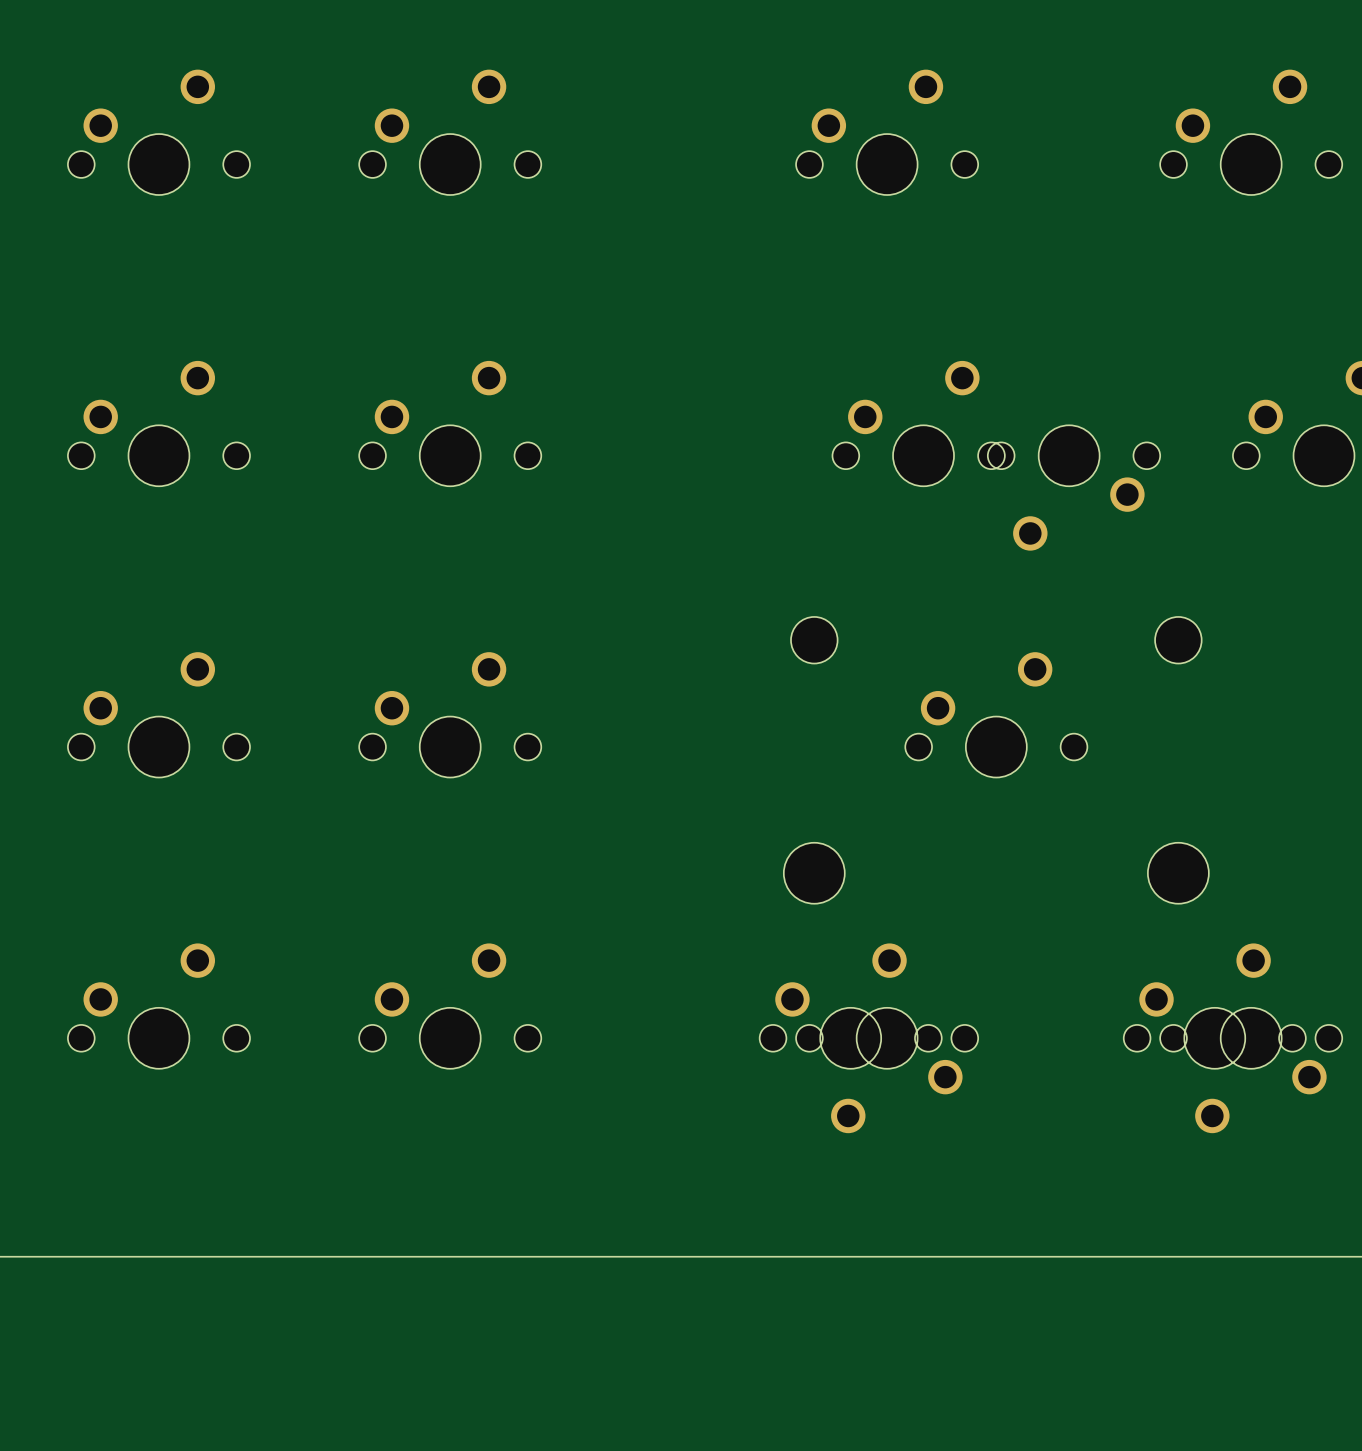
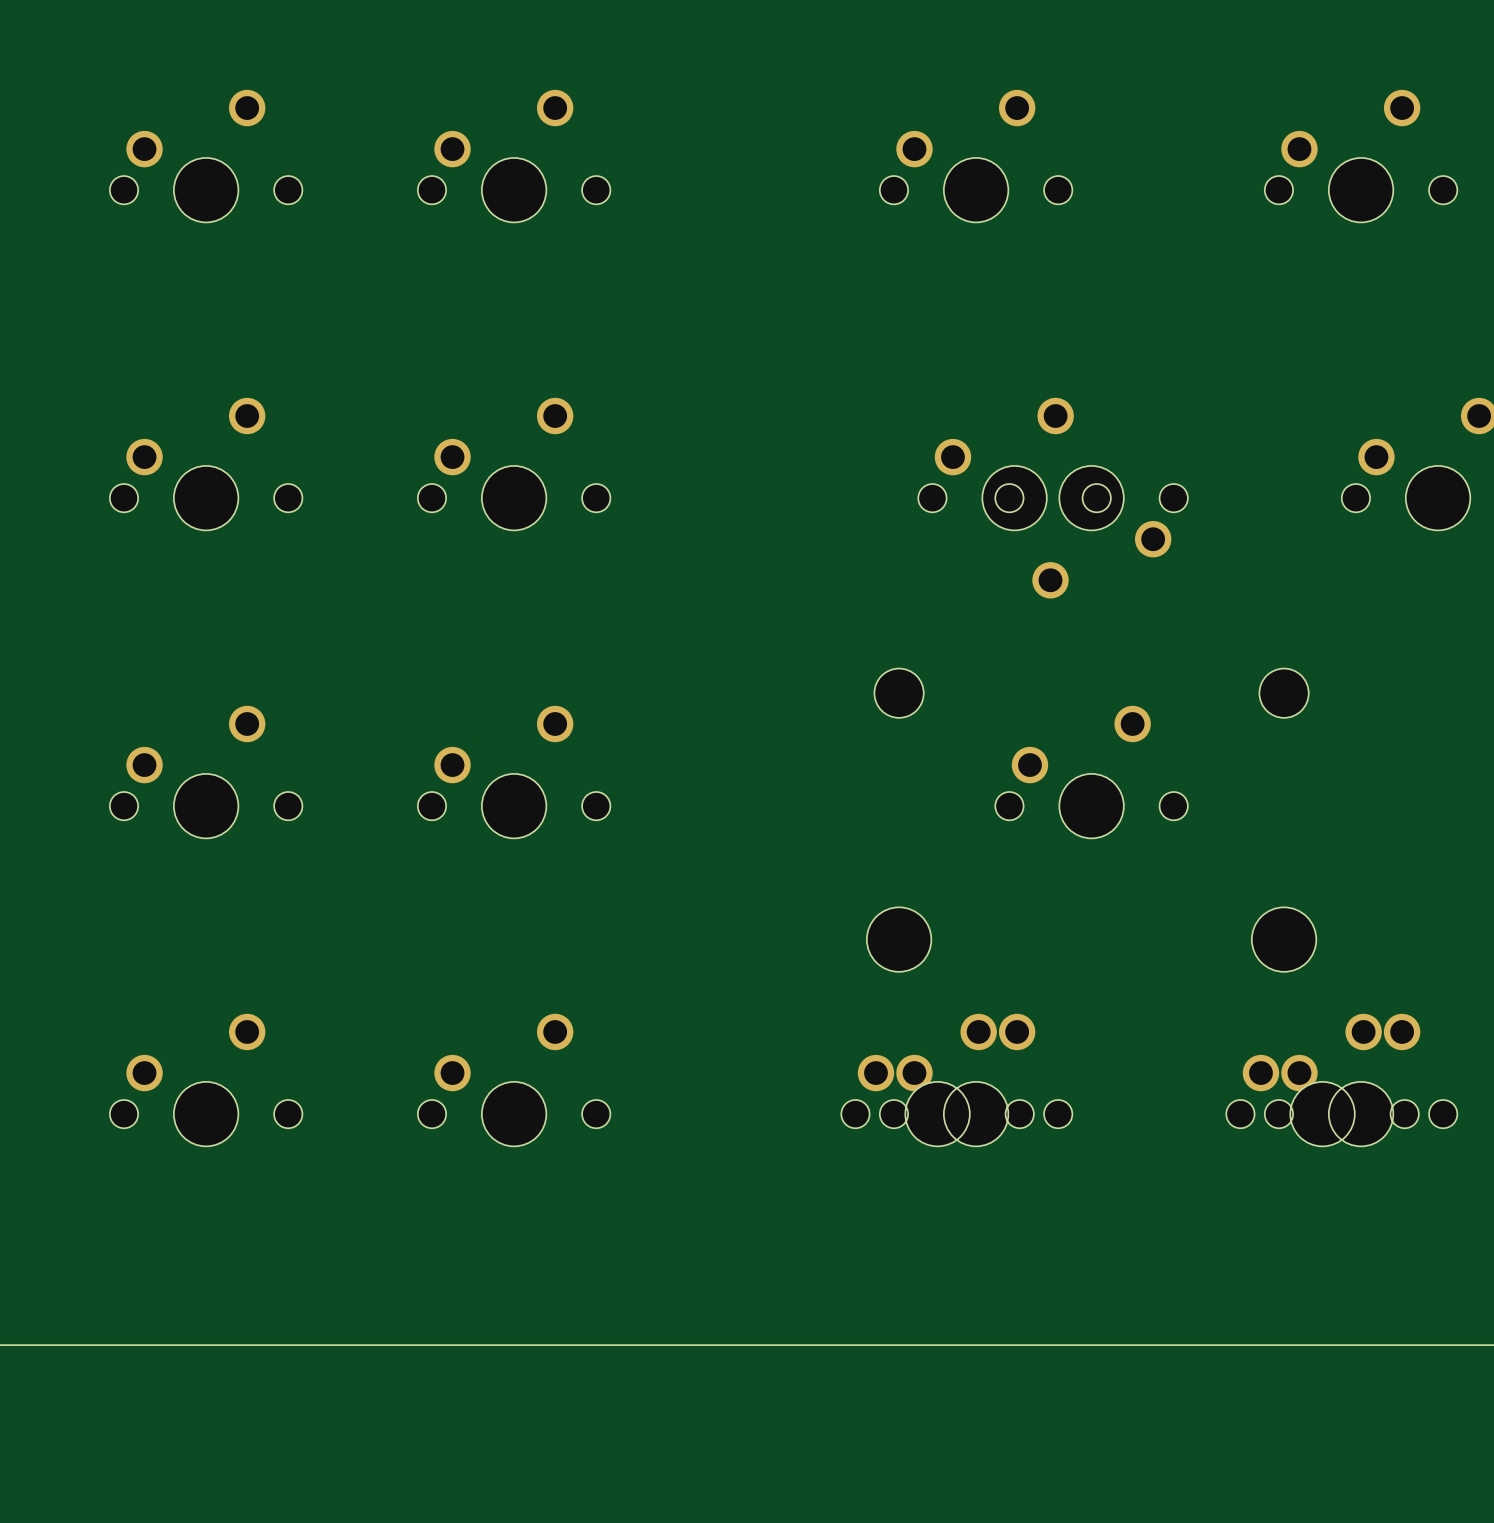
part position: (1069, 487) -> (1091, 532)
part rotation: 0° (887, 1070) -> 180° (976, 1080)
part rotation: 0° (1251, 1070) -> 180° (1361, 1080)

